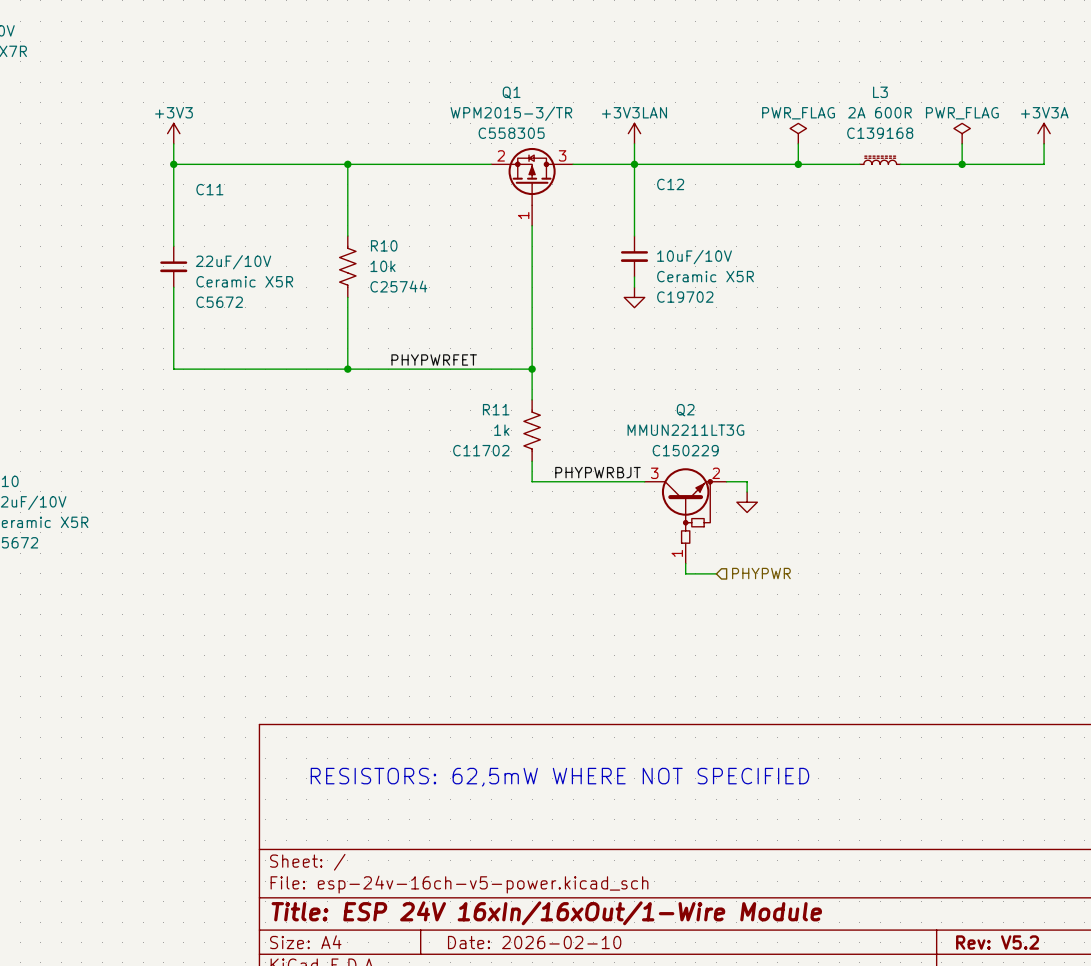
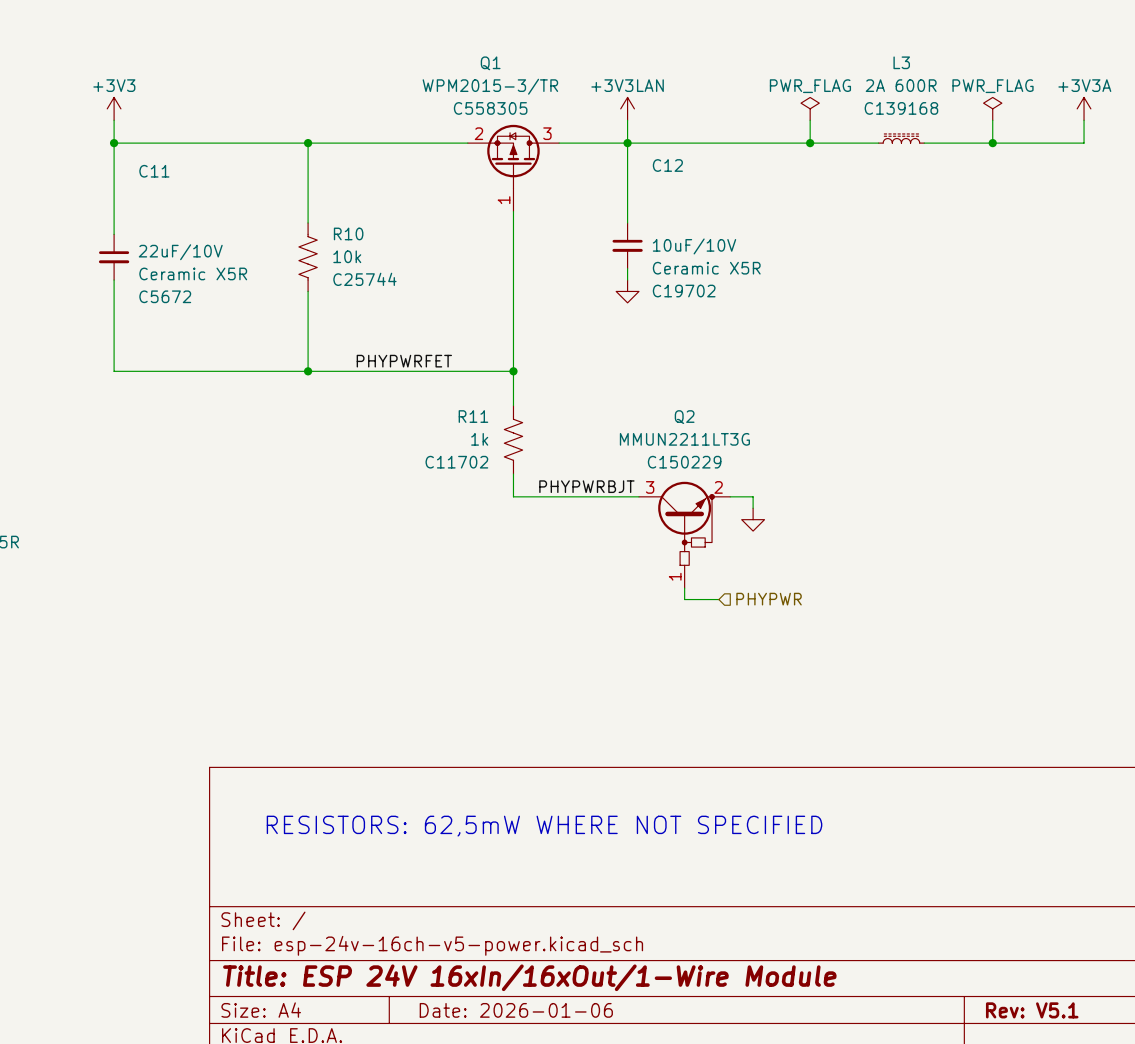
title block: Date: 2026-02-10 (534, 942) -> Date: 2026-01-06 (516, 1010)
title block: Rev: V5.2 (997, 942) -> Rev: V5.1 (1032, 1010)

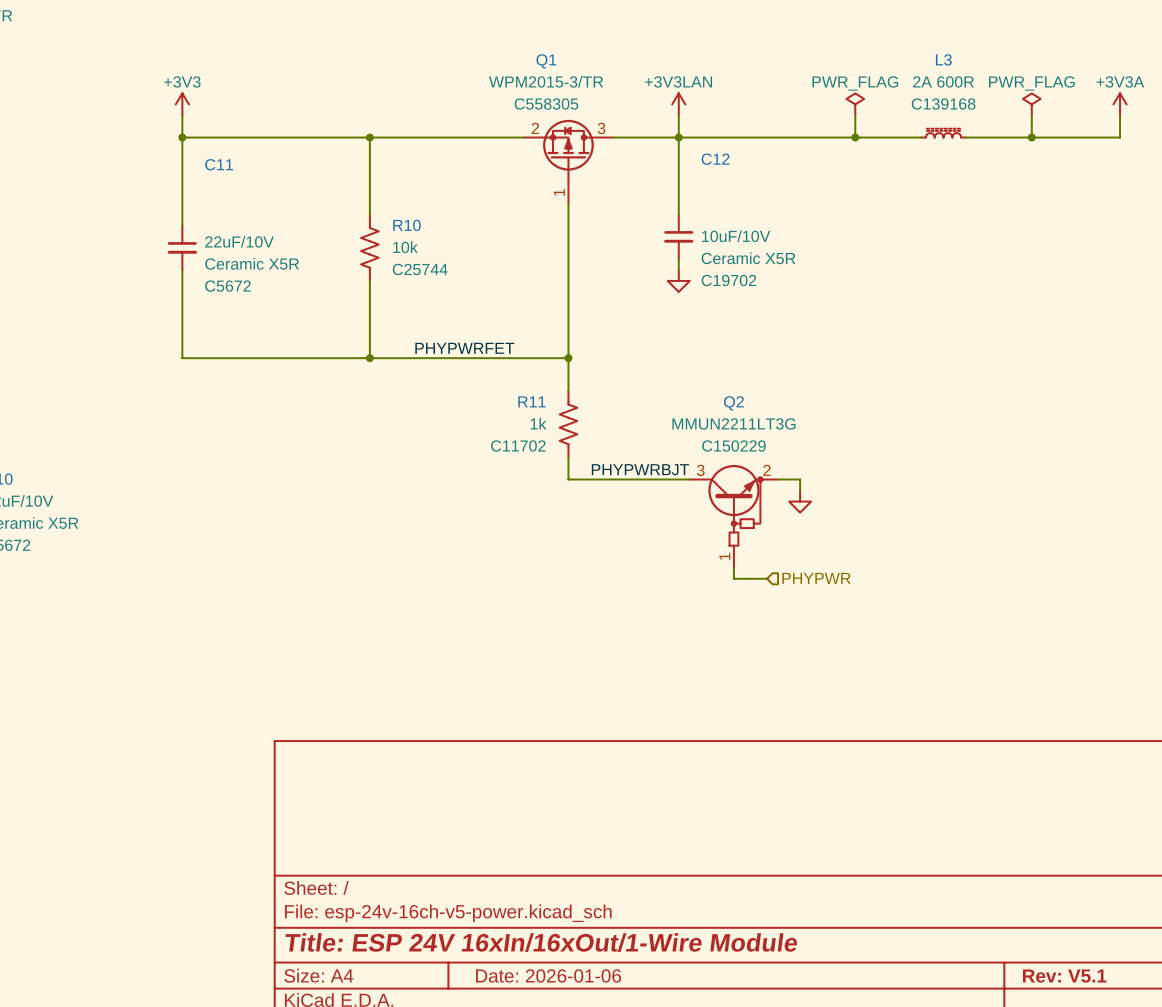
text: RESISTORS: 62,5mW WHERE NOT SPECIFIED (544, 826) -> none

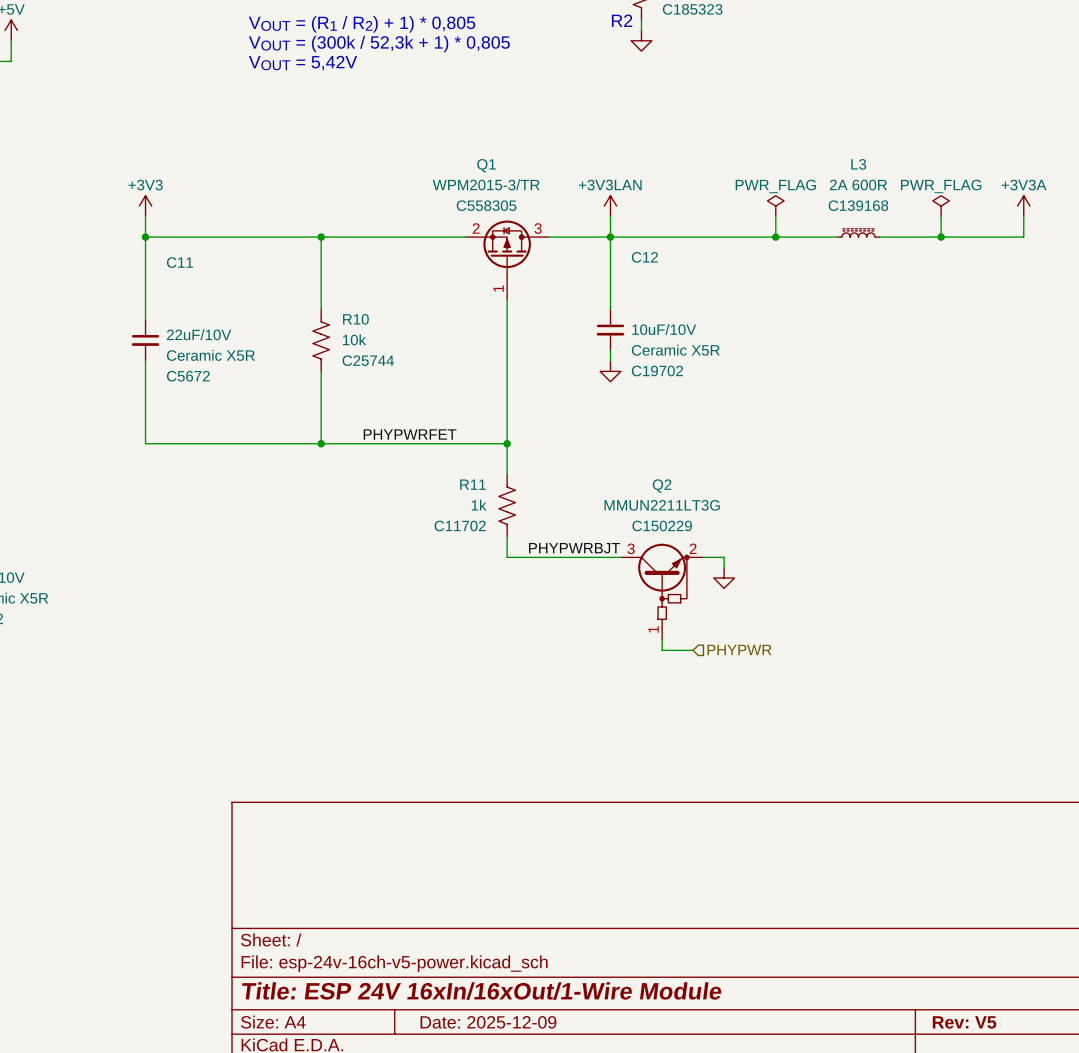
title block: Date: 2026-01-06 (548, 975) -> Date: 2025-12-09 (488, 1022)
title block: Rev: V5.1 (1064, 976) -> Rev: V5 (964, 1022)

